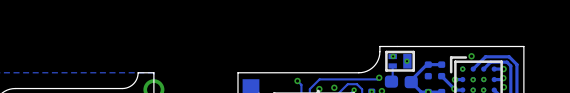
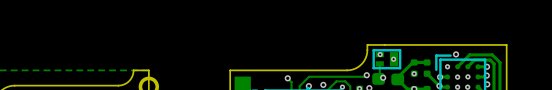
via: none -> (414, 73)
via: none -> (383, 77)

